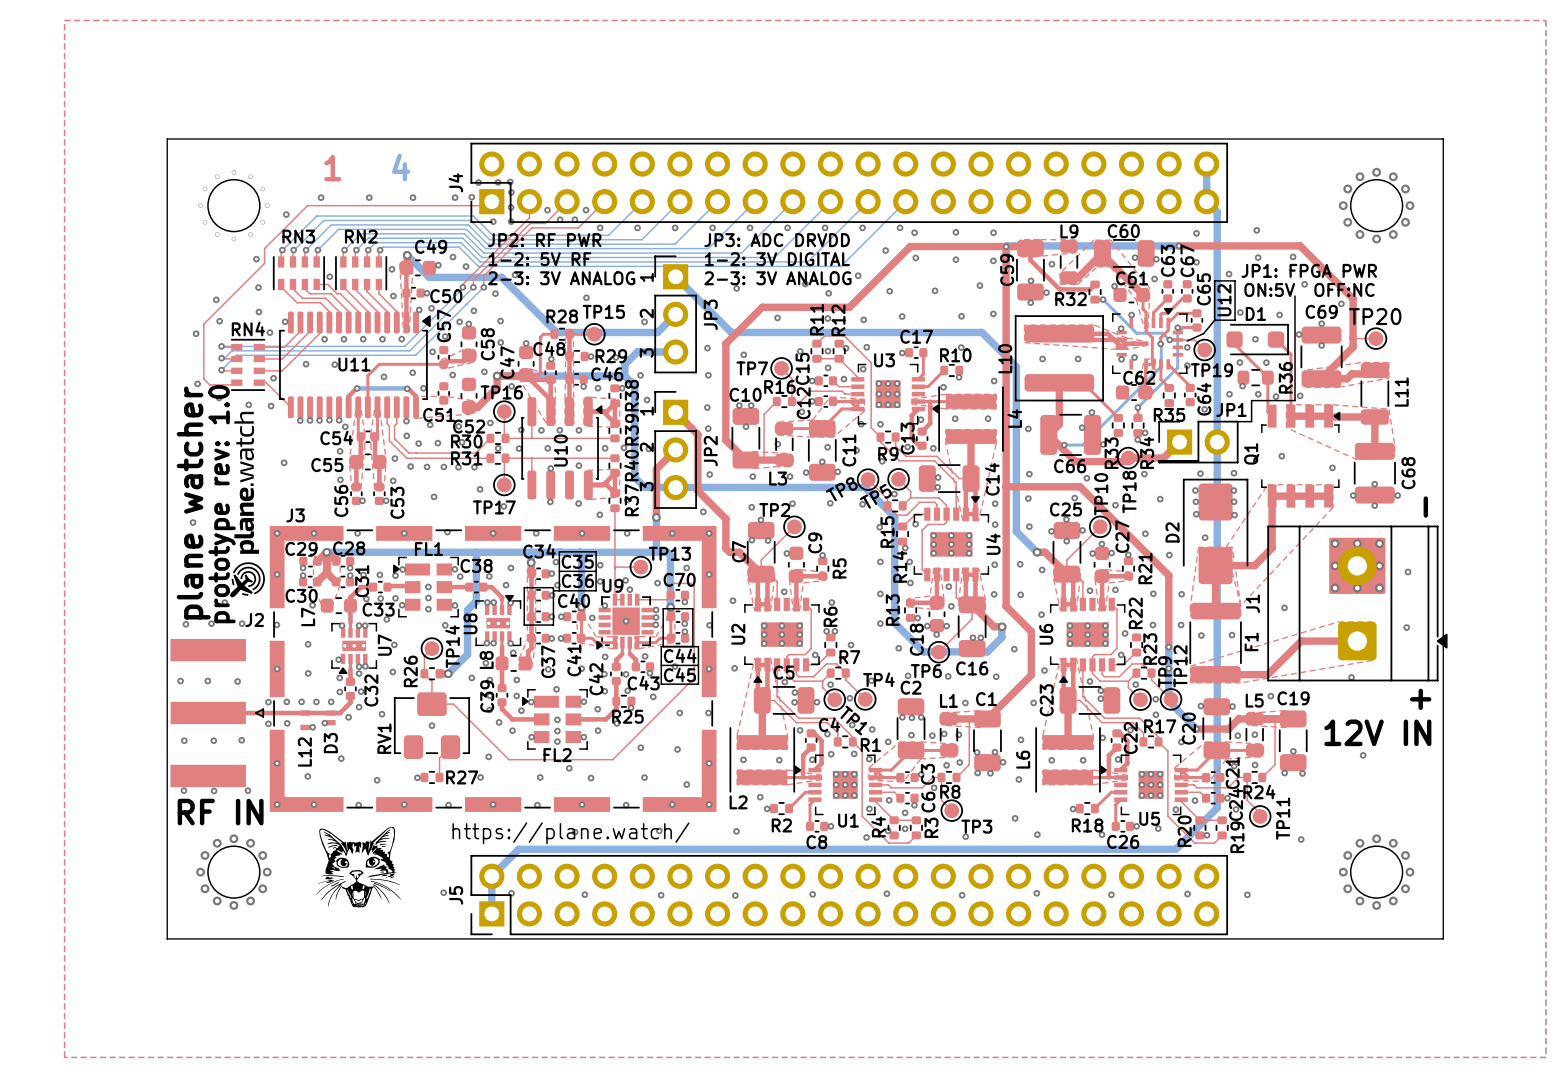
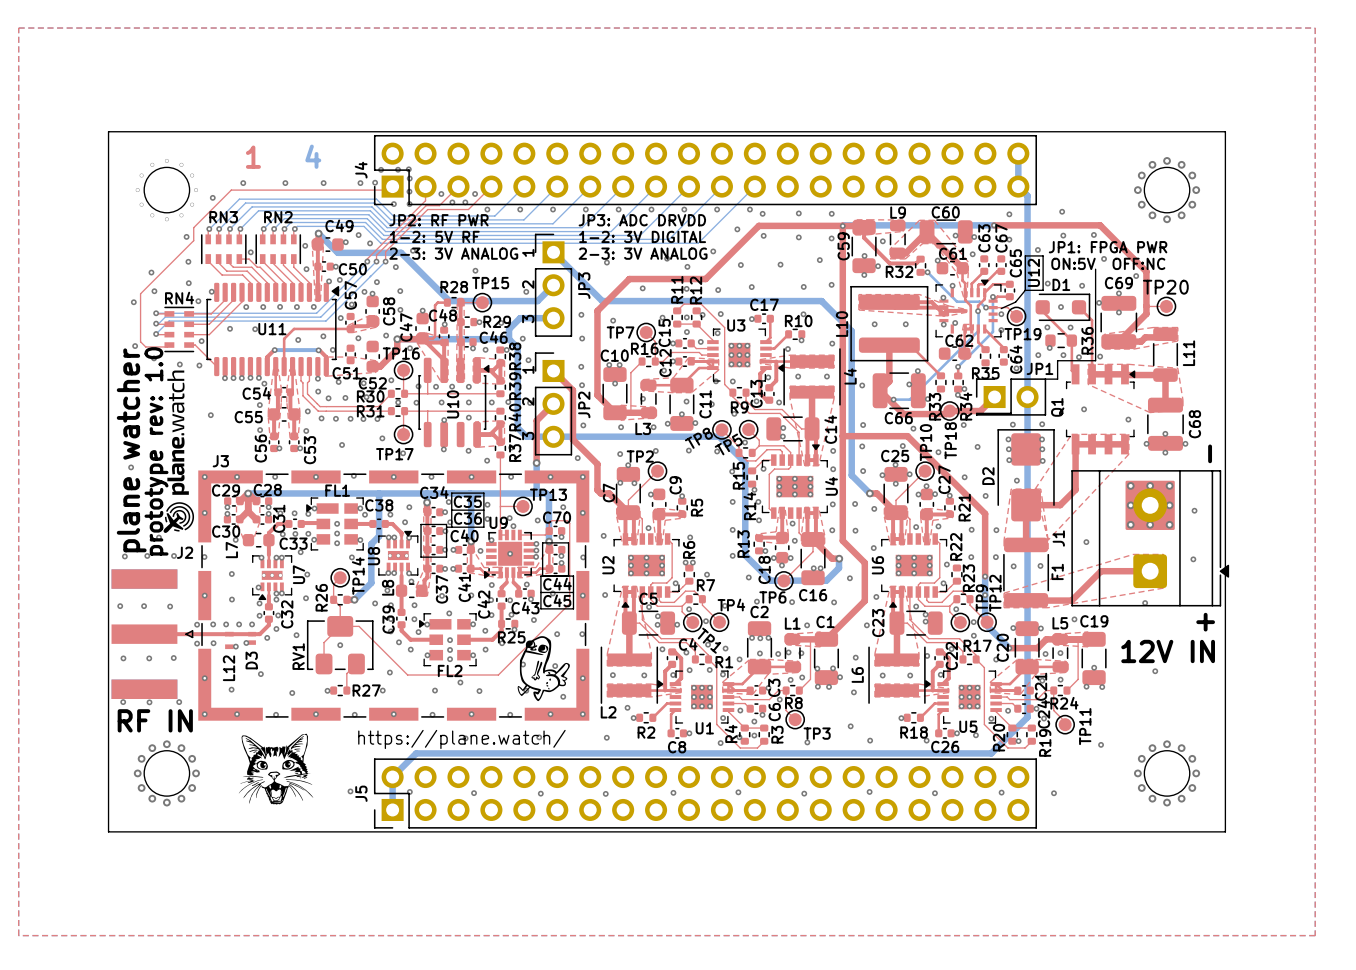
top track: none -> (340, 626) (324, 642) (324, 663)
drawing: none -> [517, 636, 570, 702]

